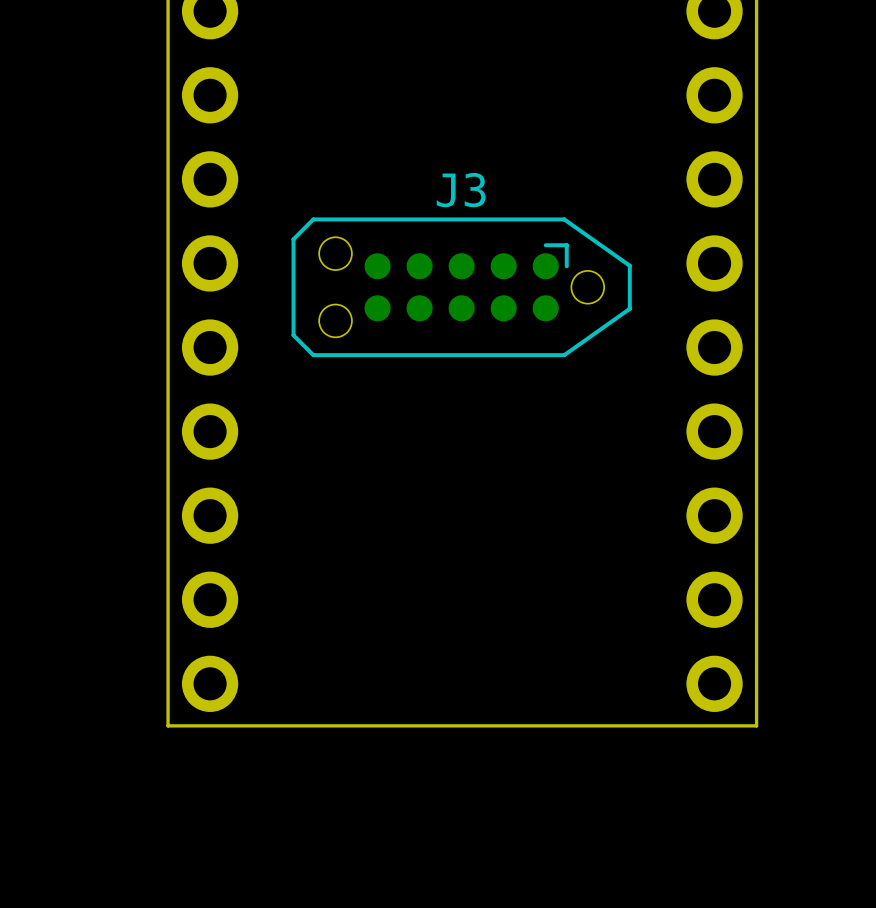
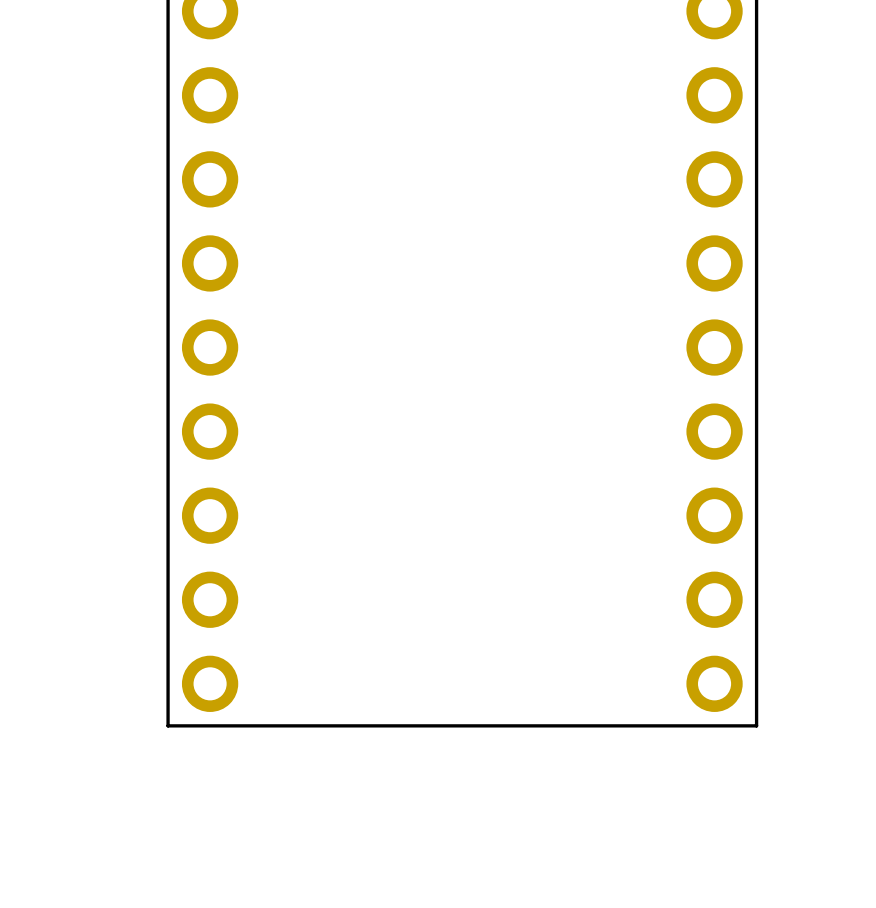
J3: (461, 287) -> none

